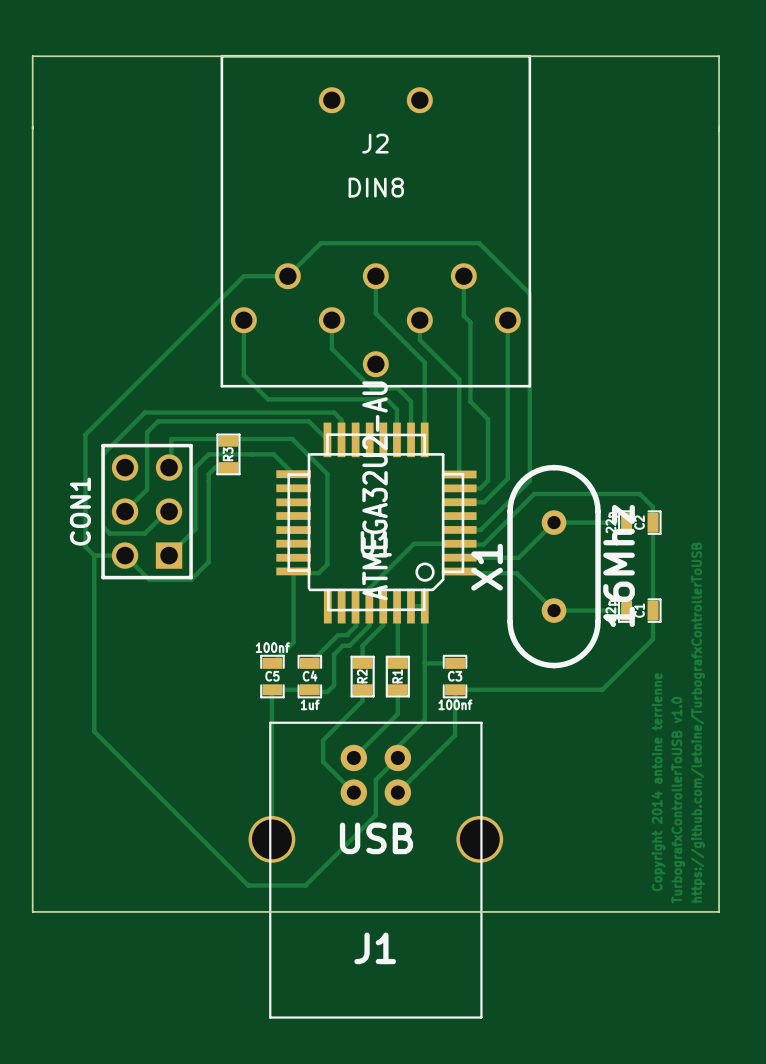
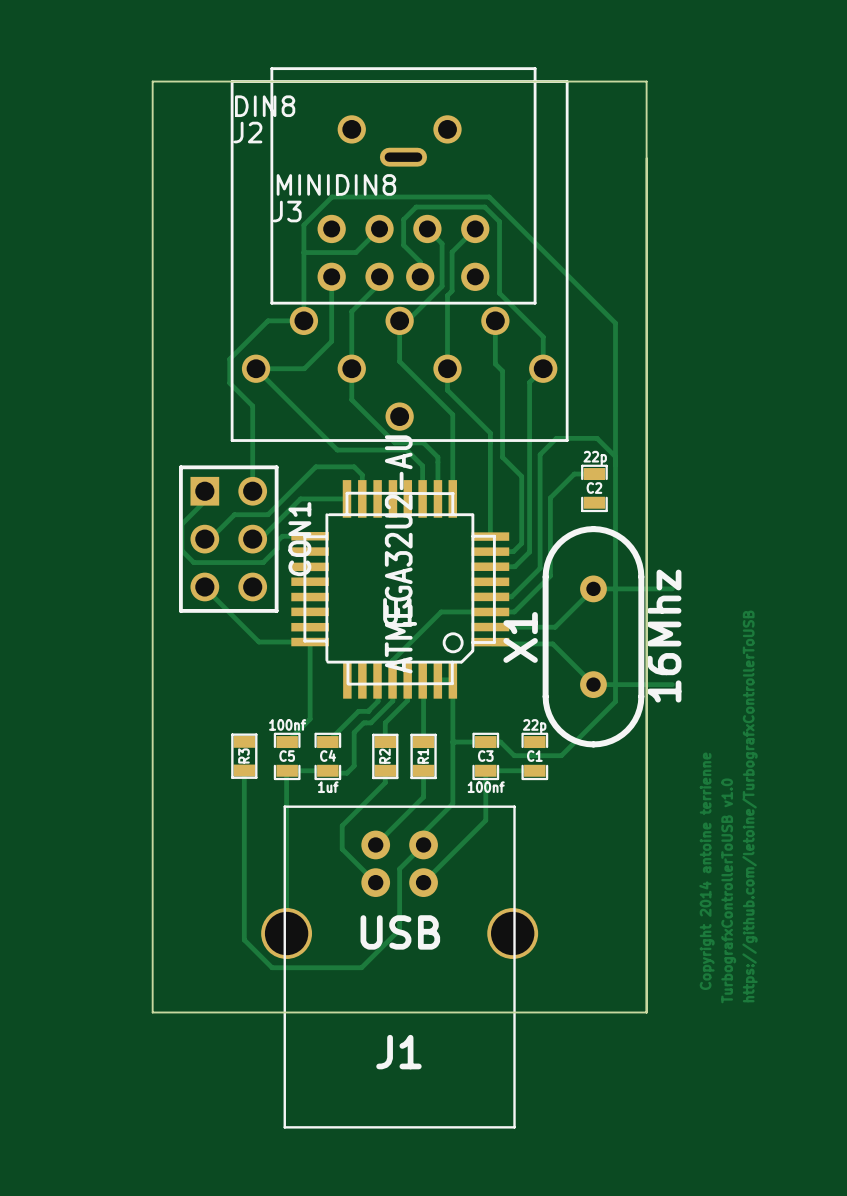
board edge: (148, 56) (32, 56) (32, 911) (148, 911) -> (152, 81) (152, 1012)
board edge: (602, 56) (719, 56) (719, 911) (602, 911) -> (646, 81) (646, 1012)
J2 name position: J2 (375, 143) -> J2 (247, 132)
J3: none -> MINIDIN8 (403, 185)
J2 value position: DIN8 (376, 187) -> DIN8 (265, 106)
track: none -> (379, 228) (355, 252) (303, 252)
track: none -> (427, 228) (442, 243) (442, 286) (407, 320) (399, 320)
track: none -> (475, 228) (452, 252) (452, 291) (447, 295) (447, 368)
track: none -> (379, 276) (379, 283) (351, 311) (351, 368)
track: (254, 276) (243, 276) (85, 434) (85, 546) (94, 555) -> (268, 320) (229, 359) (229, 383) (252, 406) (252, 491)
track: (287, 276) (320, 243) (479, 243) (529, 293) (529, 480) (478, 529) -> (303, 320) (303, 225) (332, 196) (489, 196) (615, 323) (615, 701) (561, 755) (514, 755) (500, 742) (485, 742)
track: (243, 320) (243, 375) (268, 399) (386, 399) -> (331, 276) (331, 341) (304, 368) (256, 368) (337, 450) (406, 450) (411, 454)
track: (507, 320) (507, 478) (484, 502) (481, 502) -> (420, 276) (420, 261) (403, 245) (403, 219) (416, 207) (484, 207) (499, 221) (499, 293) (543, 336) (543, 368) (529, 382) (529, 552) (514, 566)
track: none -> (615, 456) (597, 438) (556, 438) (540, 454) (540, 568) (511, 596)
track: (341, 420) (334, 412) (144, 412) (103, 454) (103, 526) (109, 533) (144, 533) (169, 511) -> (362, 477) (354, 466) (315, 466) (268, 514)
track: (327, 439) (308, 421) (158, 421) (147, 432) (147, 489) (125, 511) -> (346, 498) (300, 498) (260, 539) (252, 539)
track: (224, 454) (208, 454) (195, 467) (195, 529) (169, 555) -> (234, 514) (210, 539) (204, 539)
R3 position: (228, 454) -> (244, 756)
track: (254, 454) (273, 454) (293, 474) -> (204, 491) (204, 501) (181, 524) (181, 550) (193, 562) (263, 562) (277, 548) (277, 541) (282, 536) (310, 536)
track: (169, 467) (171, 465) (171, 439) (226, 439) (228, 441) (230, 439) (292, 439) (327, 474) (327, 564) (318, 573) (295, 573) (293, 571) -> (204, 586) (258, 642) (310, 642)
track: (228, 467) (215, 467) (208, 474) (208, 562) (191, 579) (149, 579) (125, 555) (94, 555) -> none
CON1 rotation: 0° (147, 511) -> 180° (228, 539)
C2 rotation: 0° (639, 522) -> 90° clockwise (594, 488)
C2 position: (639, 522) -> (594, 488)
track: (459, 543) (483, 544) (534, 493) (639, 493) (653, 507) (653, 639) (602, 689) (500, 689) -> (490, 611) (514, 611) (550, 575) (550, 497) (574, 474) (594, 474)
track: (94, 555) (94, 731) (248, 885) (305, 885) (375, 815) -> (244, 770) (244, 939) (272, 967) (361, 967) (399, 929) (399, 907)
C1 rotation: 0° (639, 610) -> 90° clockwise (534, 756)
C1 position: (639, 610) -> (534, 756)

